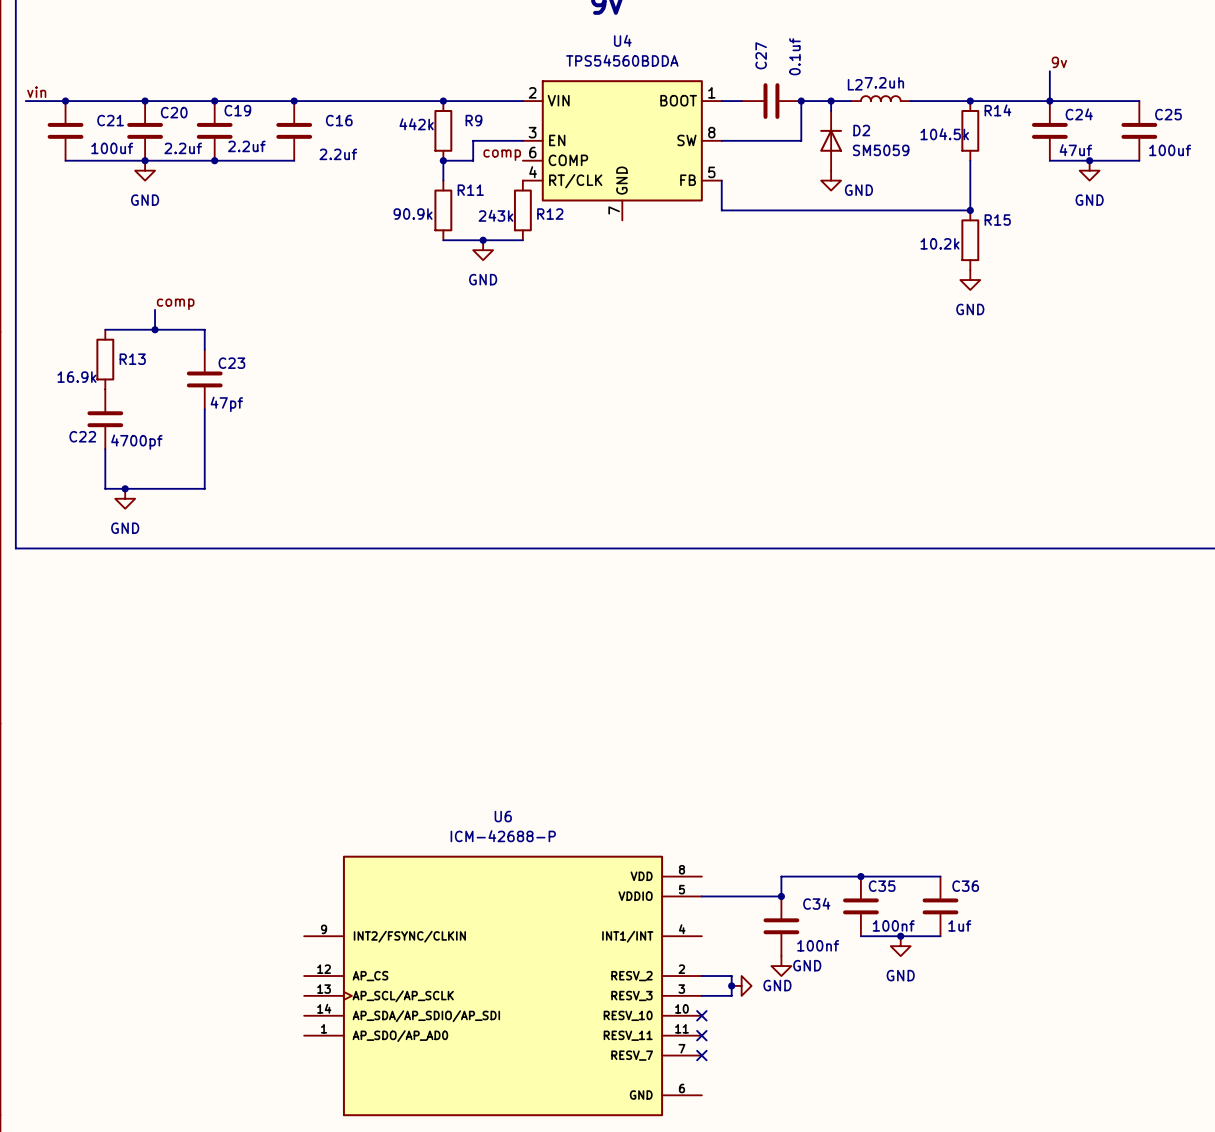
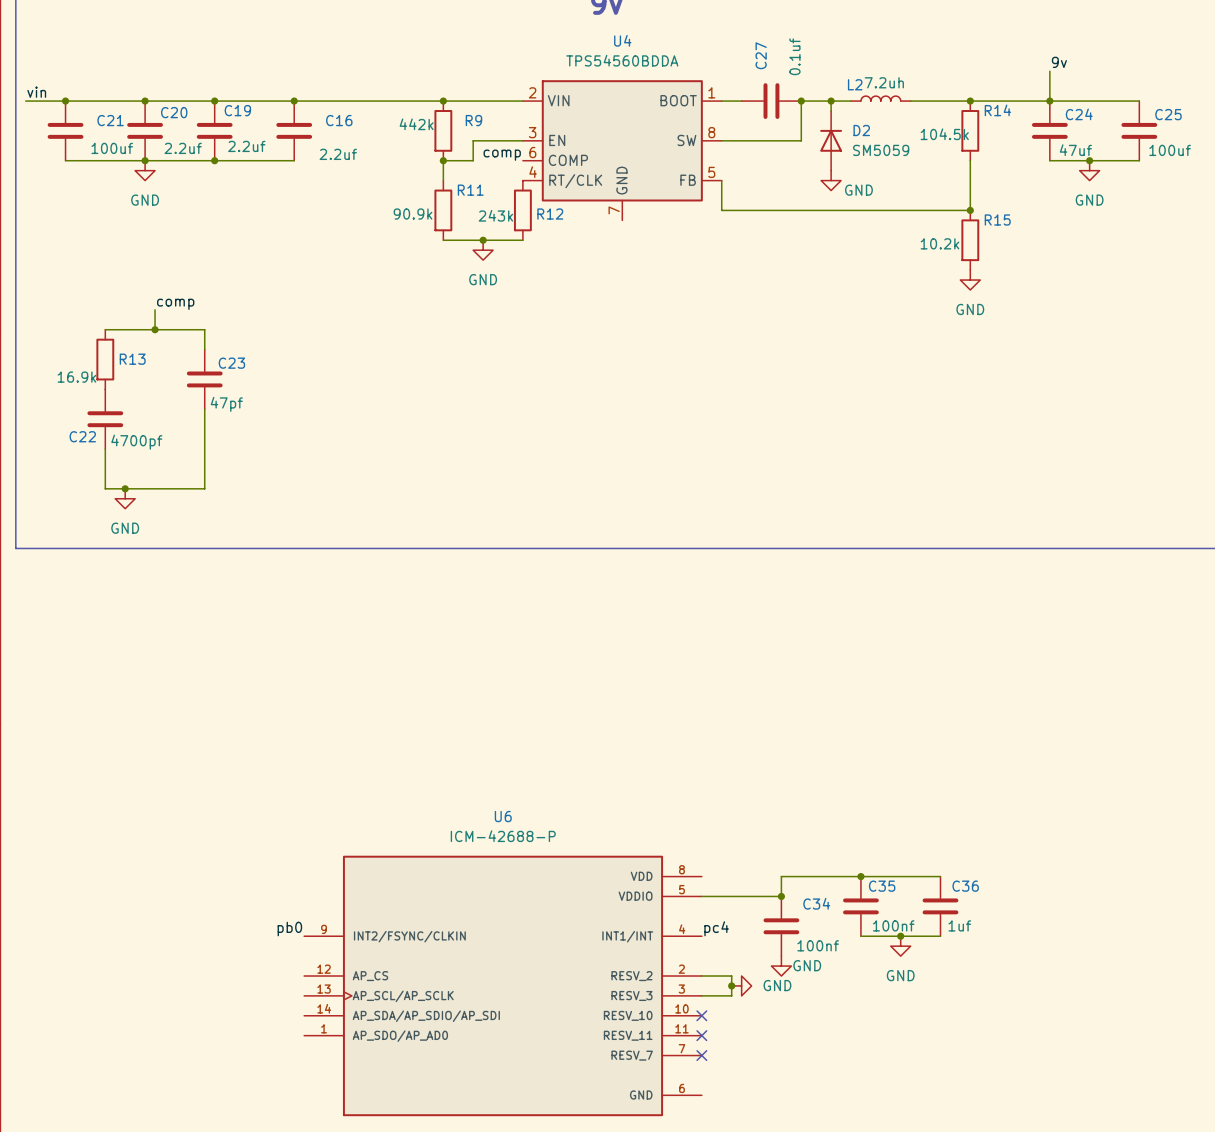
label: none -> pc4 (716, 928)
label: none -> pb0 (289, 929)

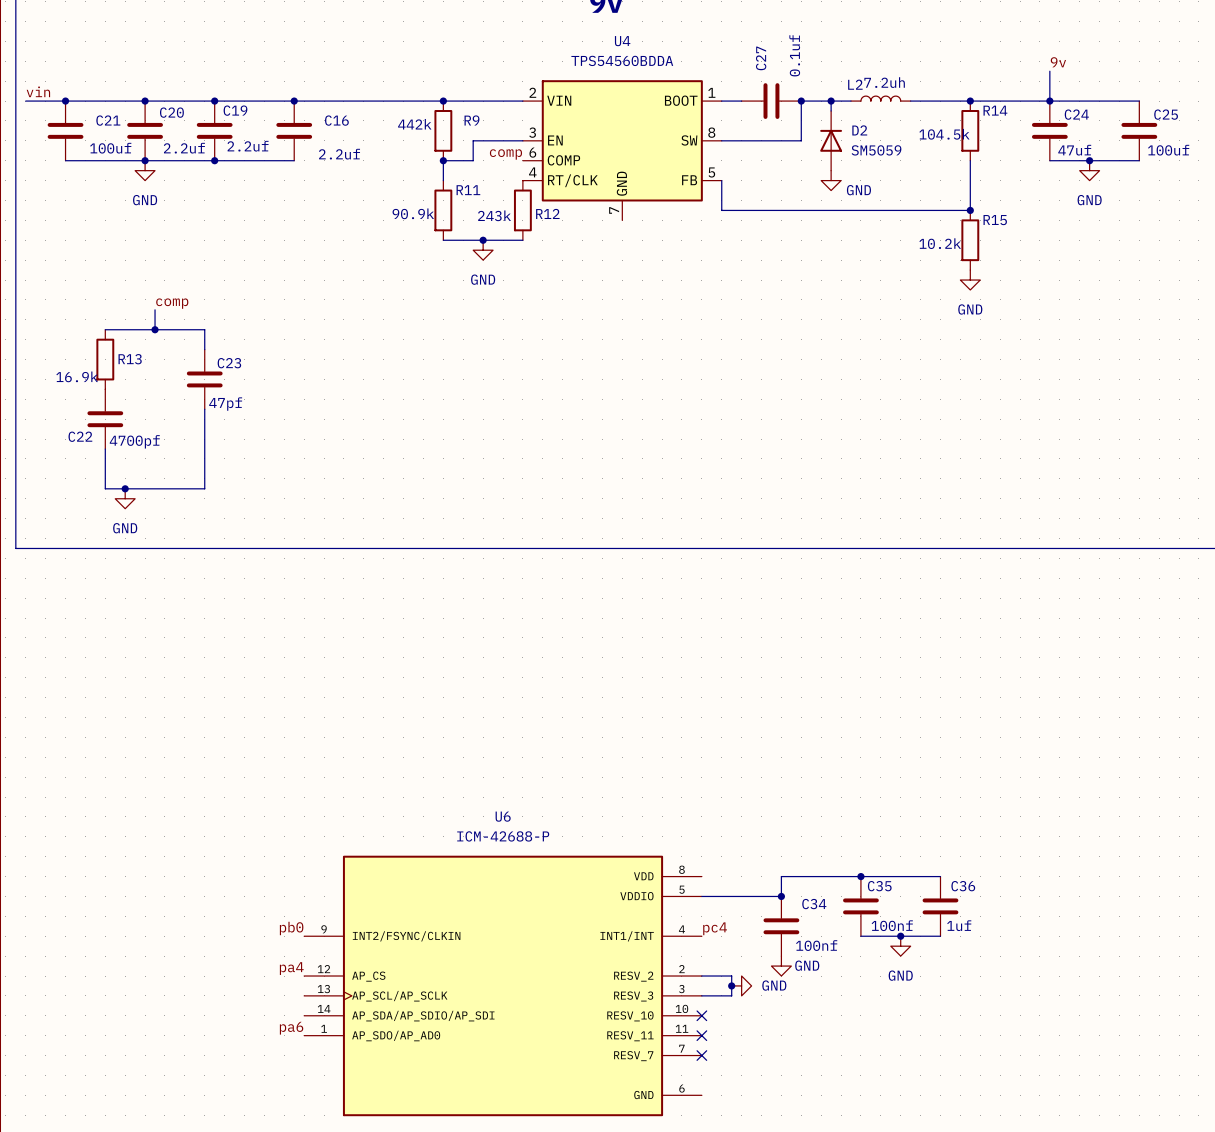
label: none -> pa4 (291, 968)
label: none -> pa6 (291, 1028)

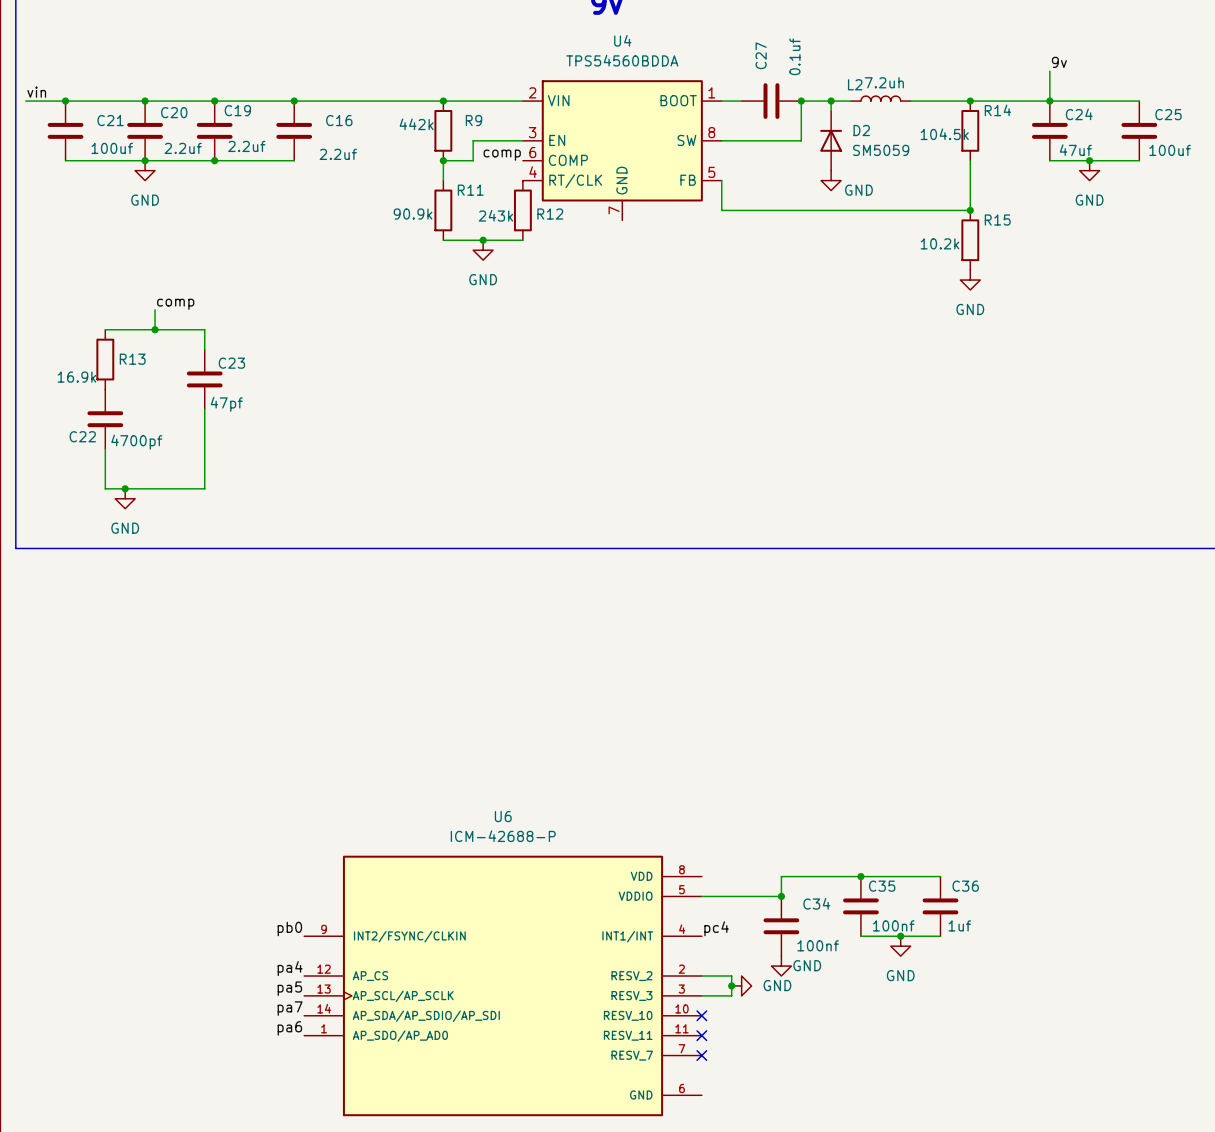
label: none -> pa5 (289, 988)
label: none -> pa7 (290, 1008)

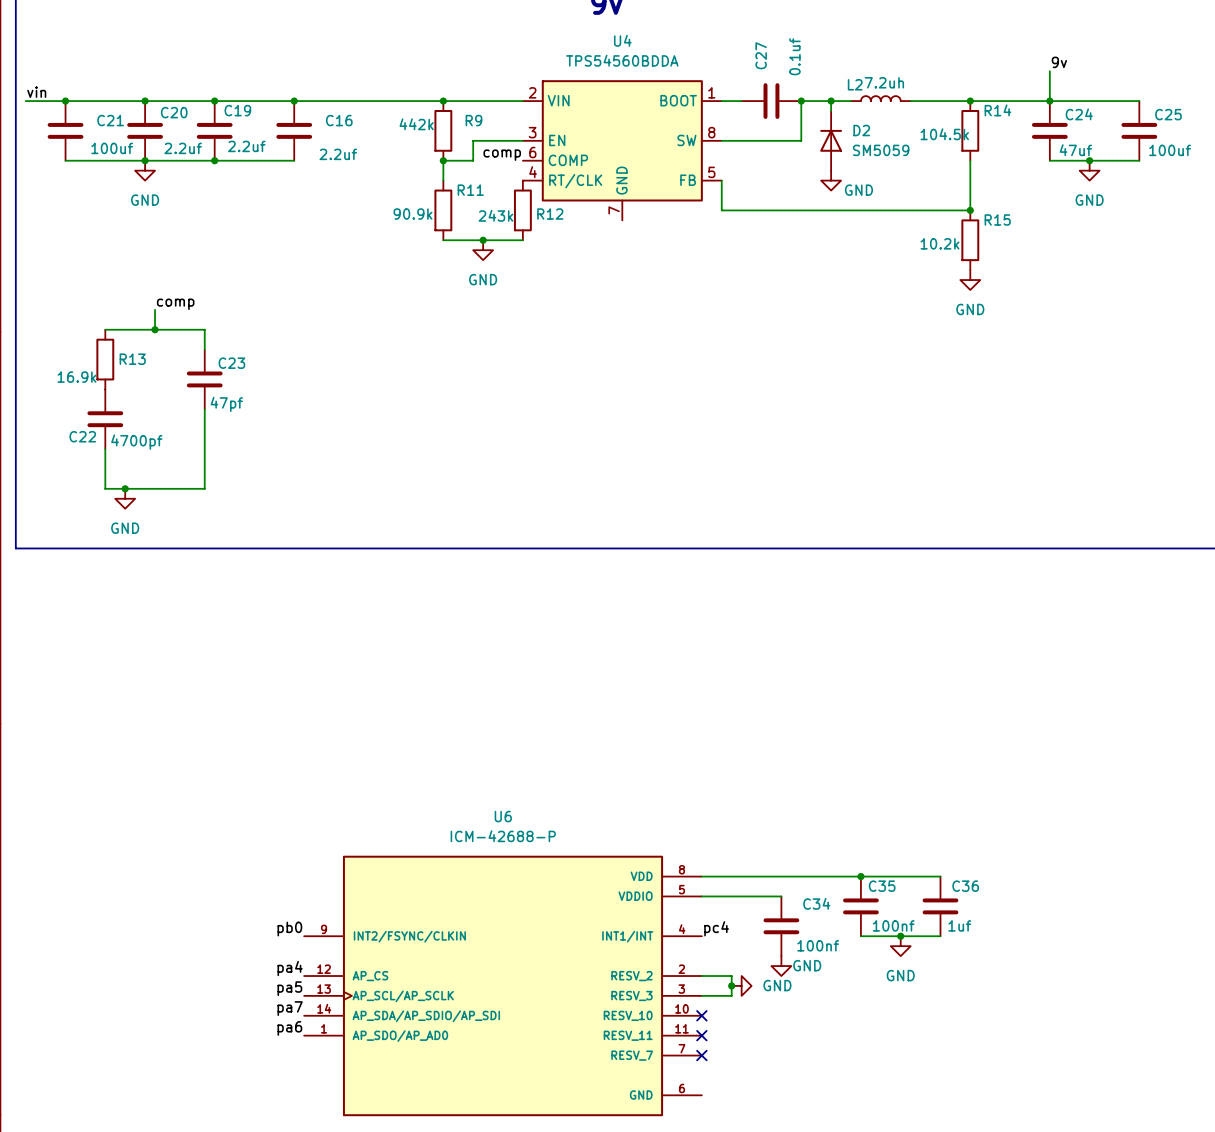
wire: (781, 876) (781, 896) -> (781, 876) (701, 876)
junction: (781, 896) -> none

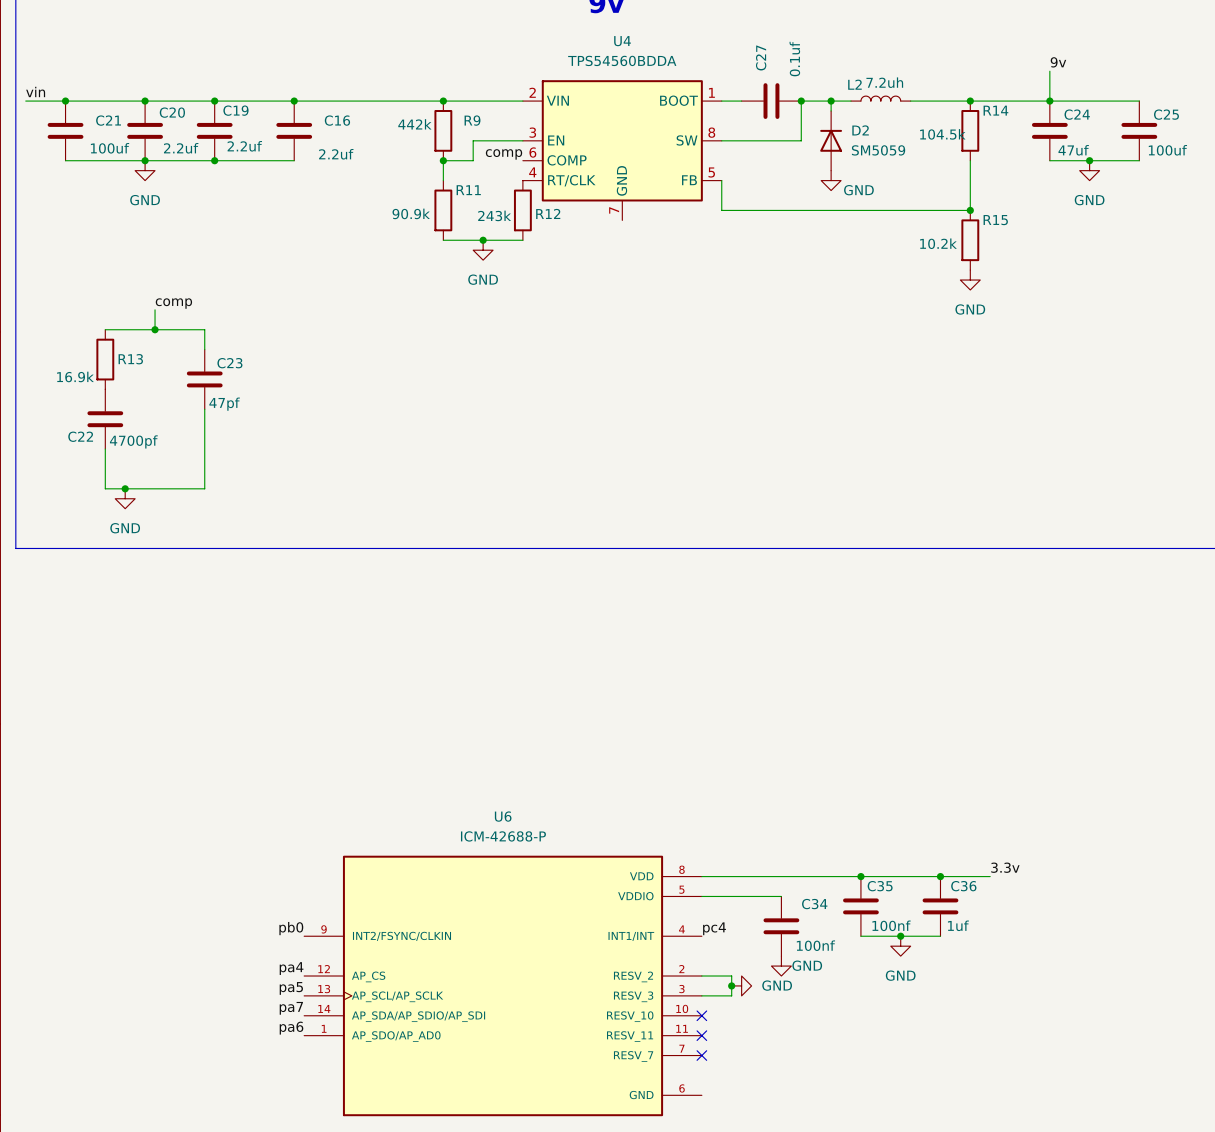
label: none -> 3.3v (1005, 867)
wire: none -> (940, 876) (990, 876)
junction: none -> (940, 876)

